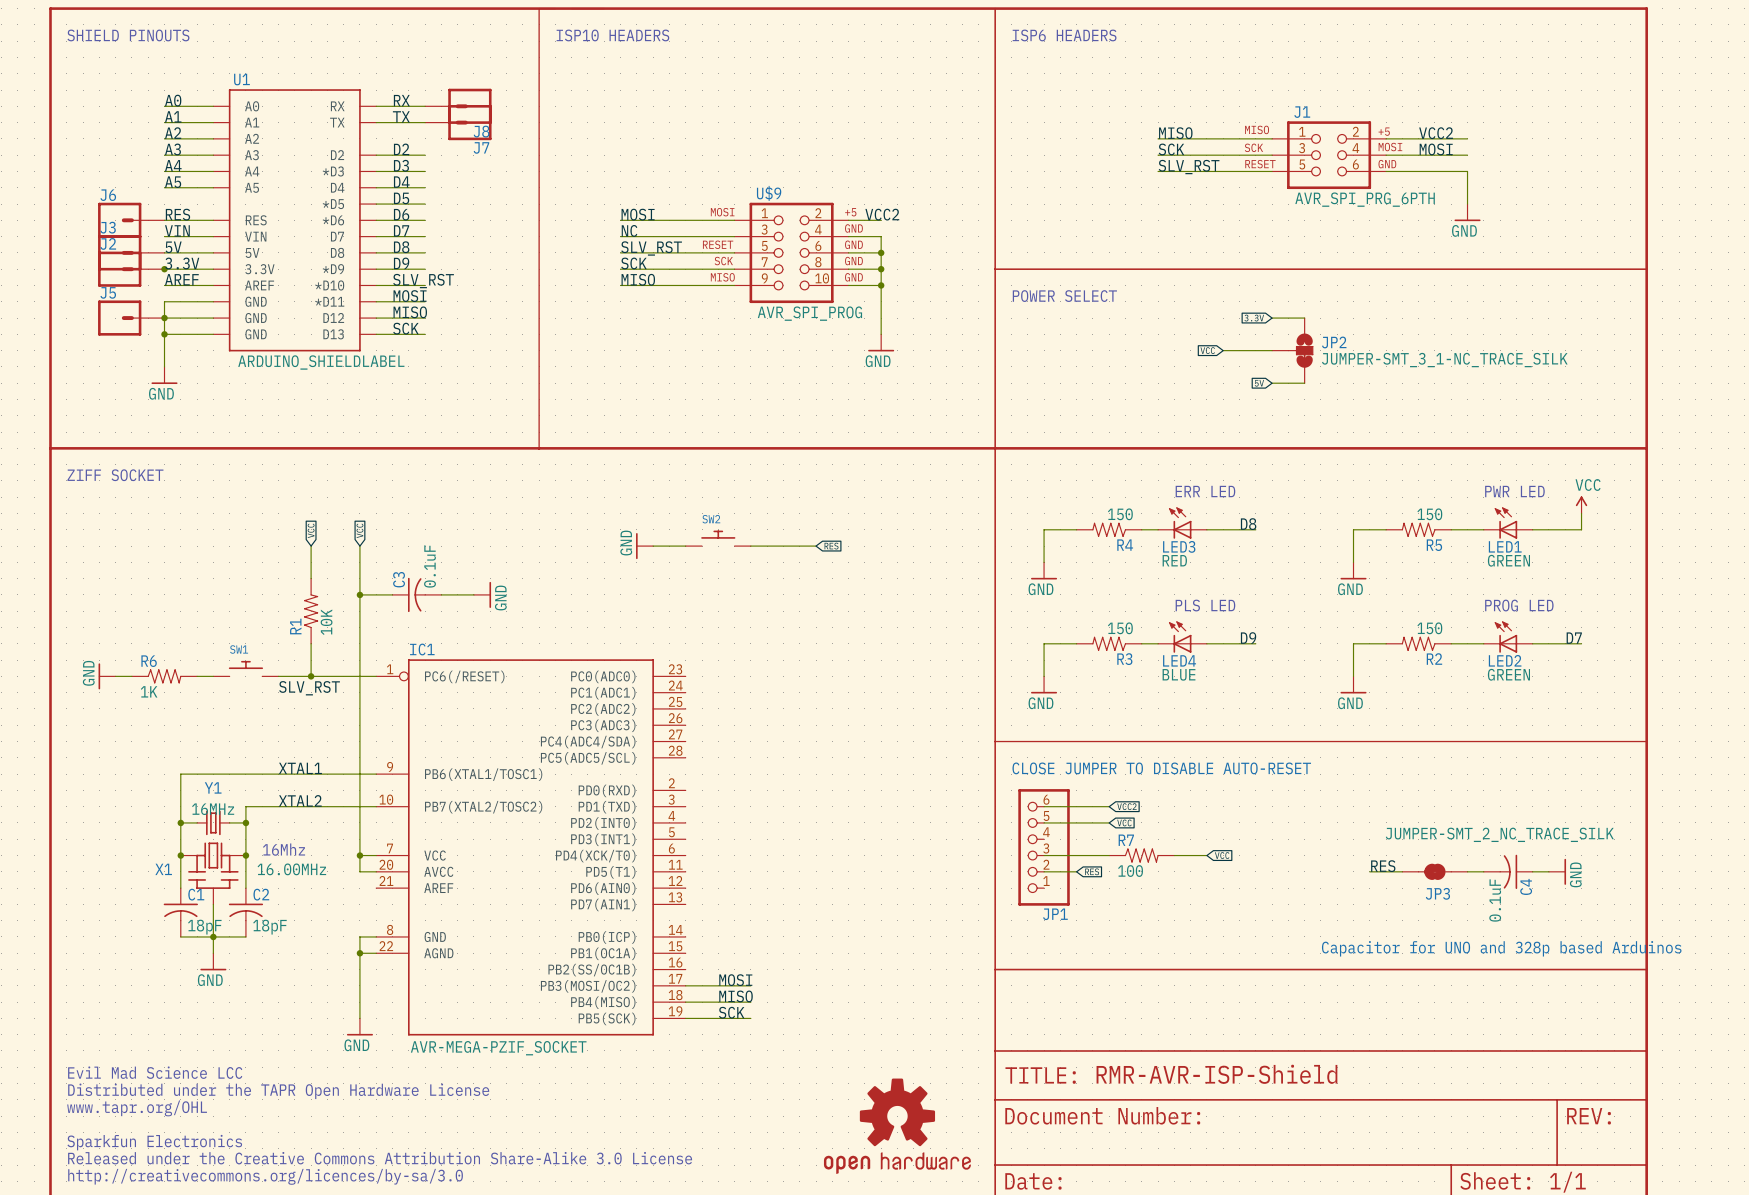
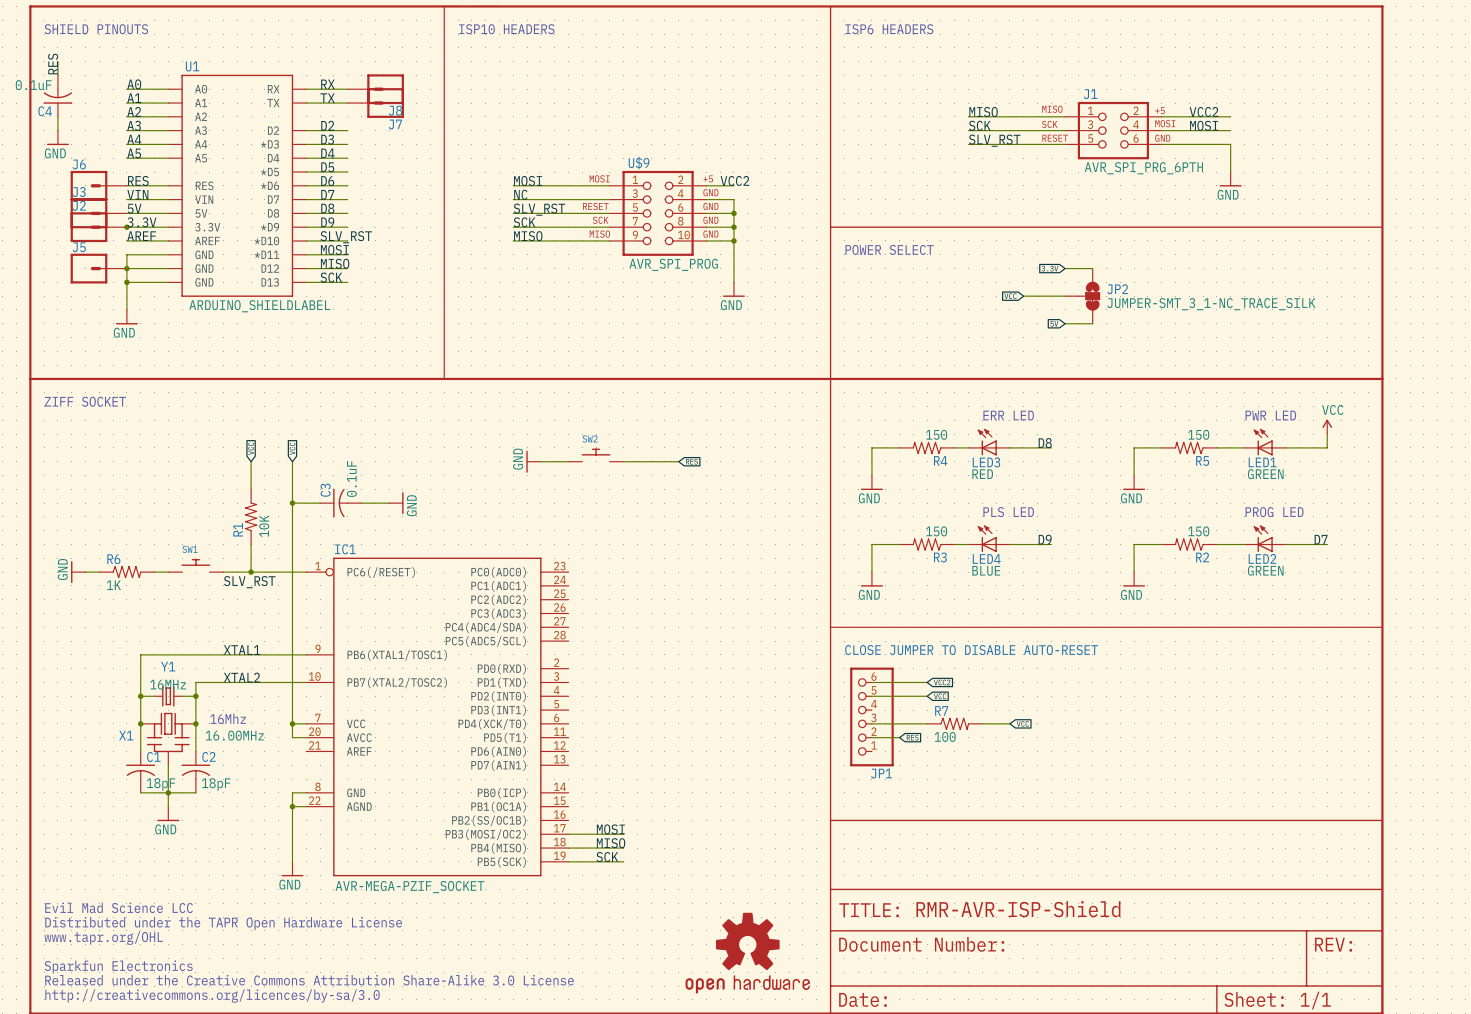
wire: none -> (57, 61) (57, 75)
label: none -> RES (53, 64)
wire: none -> (57, 116) (57, 130)
power symbol: none -> GND (57, 137)
label: RES (1383, 866) -> none
wire: (1369, 871) (1402, 871) -> none
JP3: JUMPER-SMT_2_NC_TRACE_SILK (1434, 871) -> none
wire: (1467, 871) (1483, 871) -> none
C4 rotation: 0° (1508, 871) -> 90° clockwise (57, 96)
C4 position: (1508, 871) -> (57, 96)
wire: (1532, 871) (1548, 871) -> none
power symbol: GND (1557, 871) -> none
text: Capacitor for UNO and 328p based Arduinos (1501, 948) -> none

